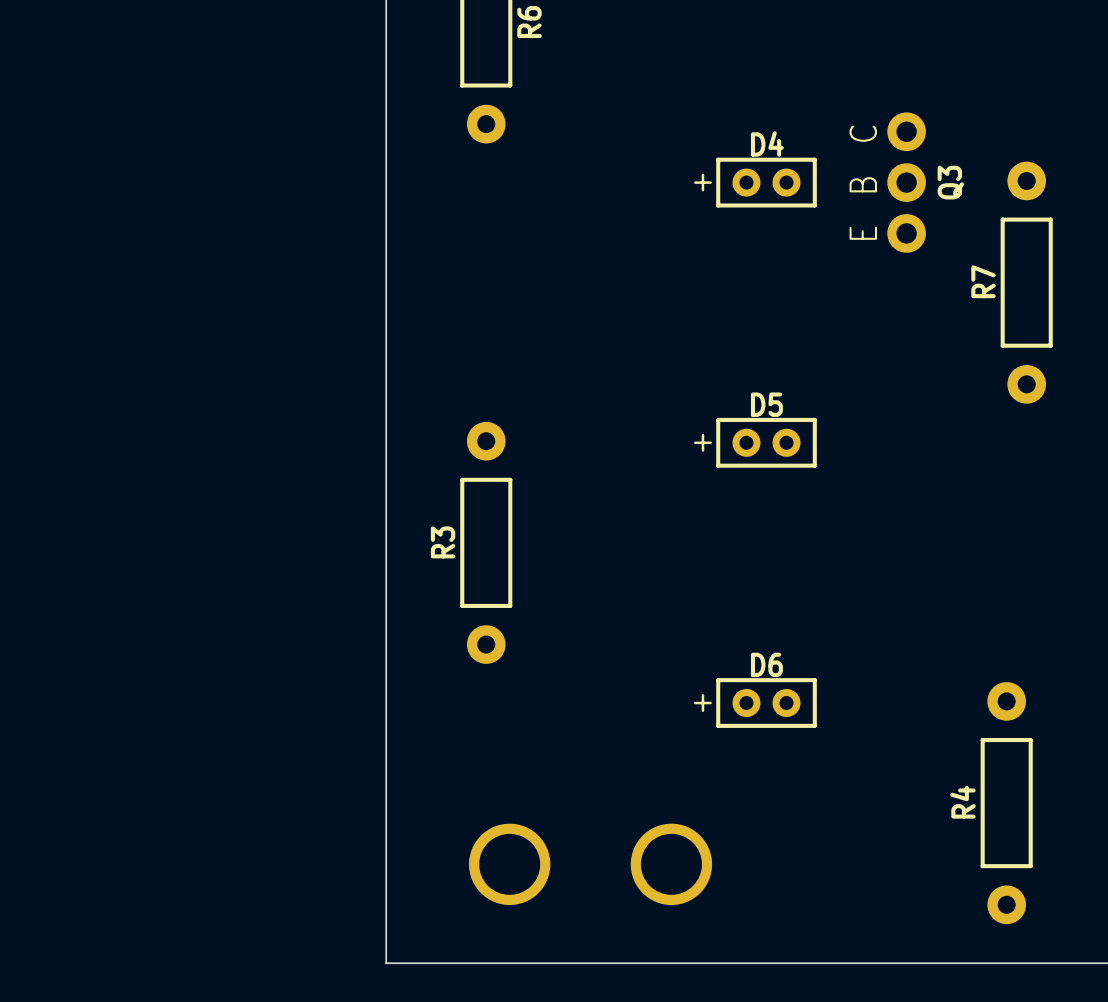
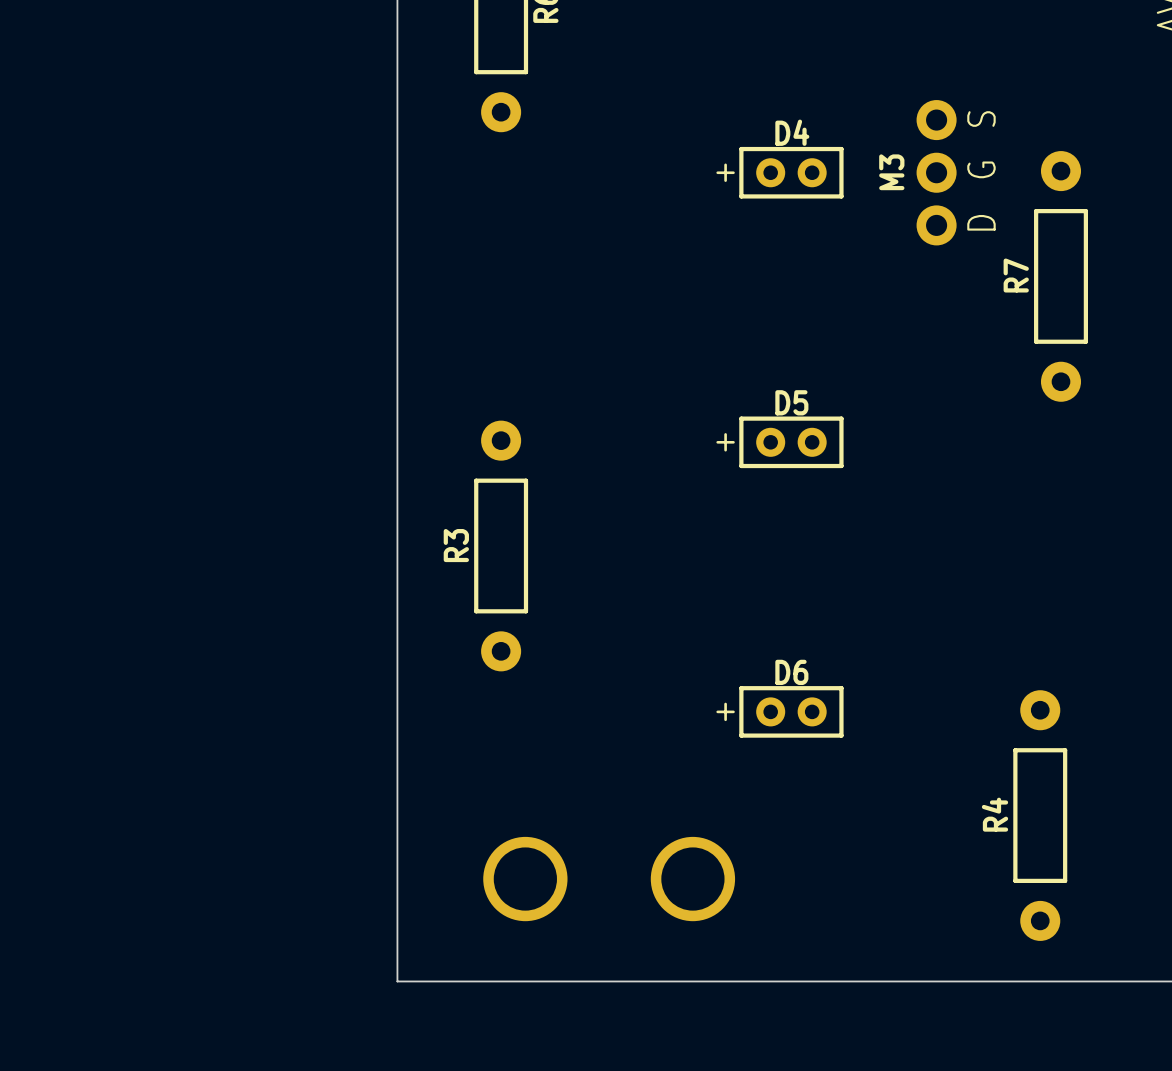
Q3 text: none -> S (981, 119)
Q3 text: C (863, 133) -> none
Q3 text: none -> G (981, 169)
Q3 name: Q3 (950, 182) -> M3 (891, 172)
Q3 text: B (863, 184) -> none
Q3 text: none -> D (981, 222)
Q3 text: E (863, 233) -> none

